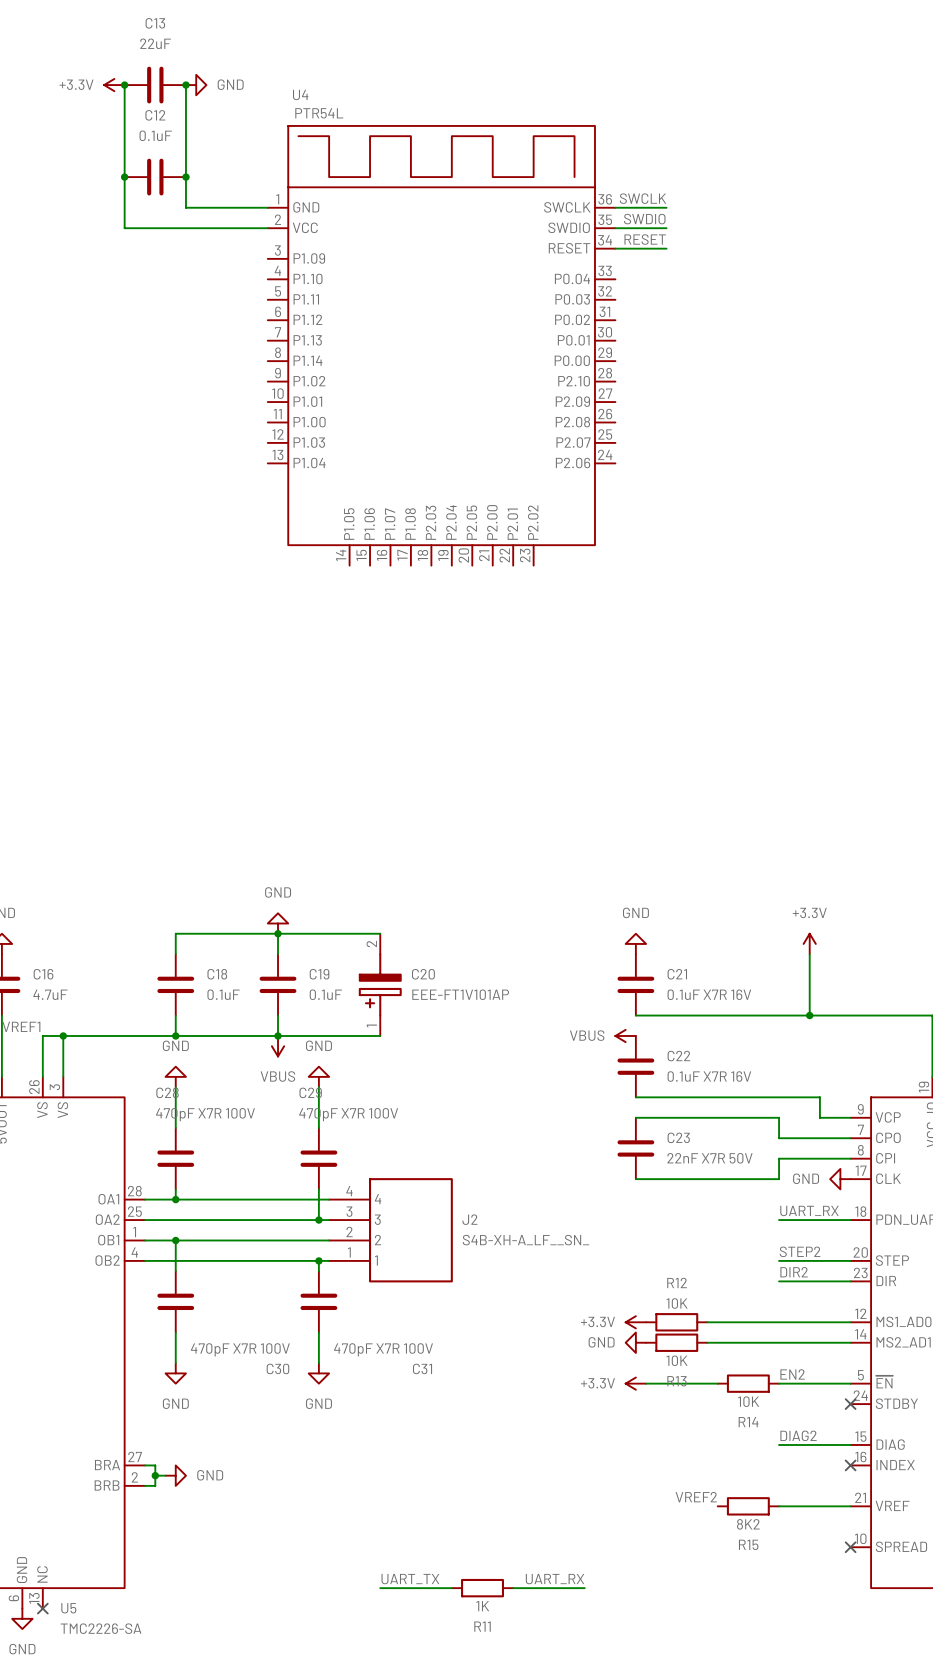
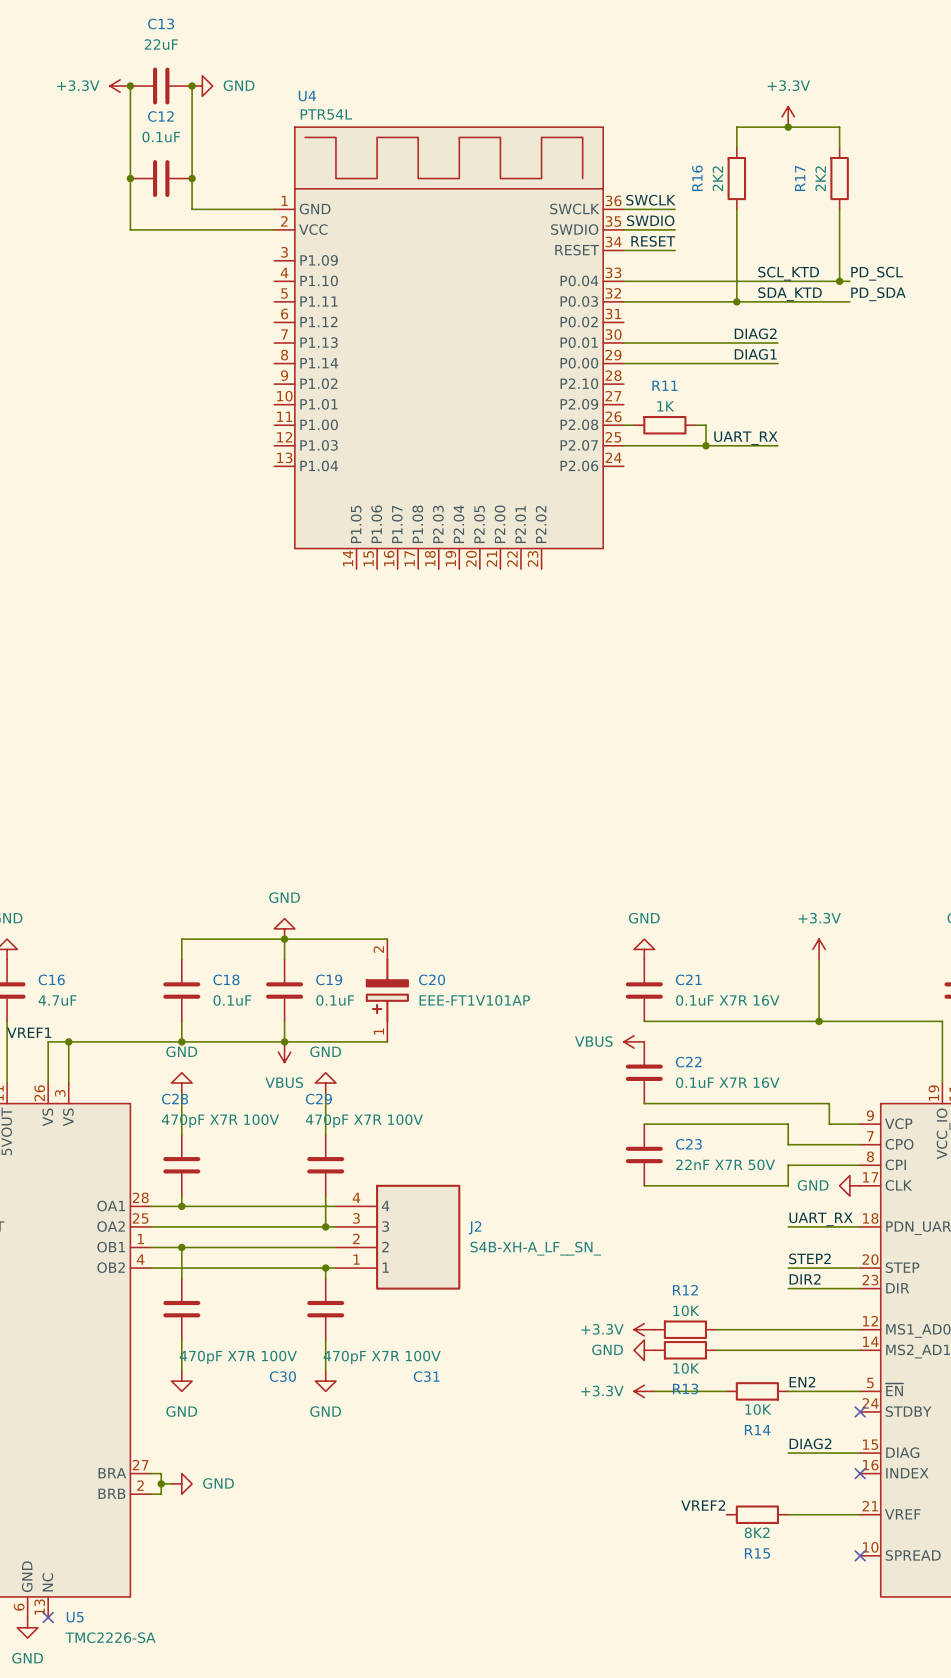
power symbol: none -> +3.3V (788, 116)
junction: none -> (788, 127)
wire: none -> (736, 147) (736, 127) (839, 127) (839, 147)
R16: none -> 2K2 (736, 178)
R17: none -> 2K2 (839, 178)
wire: none -> (736, 209) (736, 301)
wire: none -> (839, 209) (839, 281)
label: none -> SCL_KTD (788, 273)
label: none -> PD_SCL (877, 273)
wire: none -> (623, 281) (849, 281)
junction: none -> (839, 281)
label: none -> SDA_KTD (790, 294)
label: none -> PD_SDA (878, 294)
wire: none -> (623, 301) (849, 301)
junction: none -> (736, 301)
label: none -> DIAG2 (755, 333)
wire: none -> (623, 343) (777, 343)
label: none -> DIAG1 (755, 354)
wire: none -> (623, 363) (777, 363)
wire: none -> (623, 425) (634, 425)
wire: none -> (695, 425) (705, 425) (705, 445)
label: none -> UART_RX (745, 438)
wire: none -> (623, 445) (777, 445)
junction: none -> (705, 445)
label: UART_TX (410, 1579) -> none
label: UART_RX (555, 1579) -> none
wire: (380, 1588) (451, 1588) -> none
R11 position: (482, 1588) -> (664, 425)
wire: (513, 1588) (584, 1588) -> none
R11 value position: 1K (482, 1606) -> 1K (665, 406)
R11 name position: R11 (482, 1626) -> R11 (664, 385)

